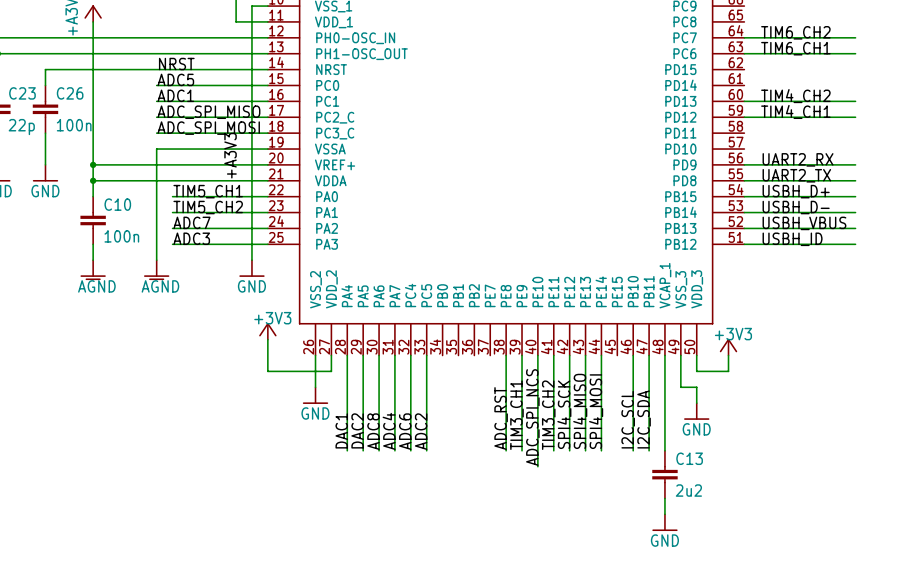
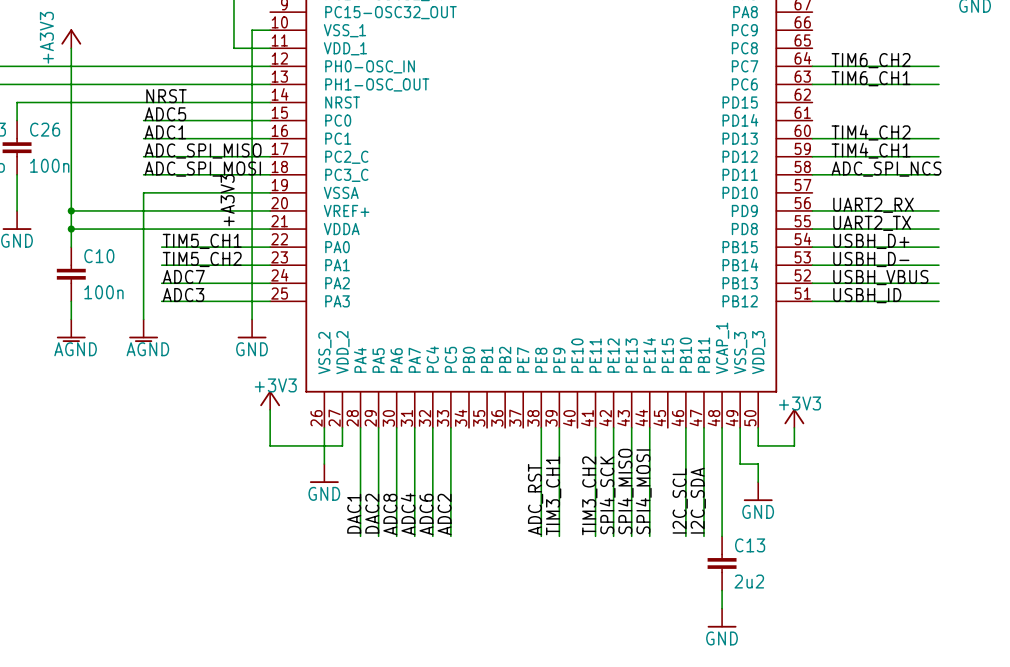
label: none -> ADC_SPI_NCS (886, 169)
wire: none -> (812, 174) (938, 174)
wire: (537, 355) (537, 466) -> none
label: ADC_SPI_NCS (532, 417) -> none

